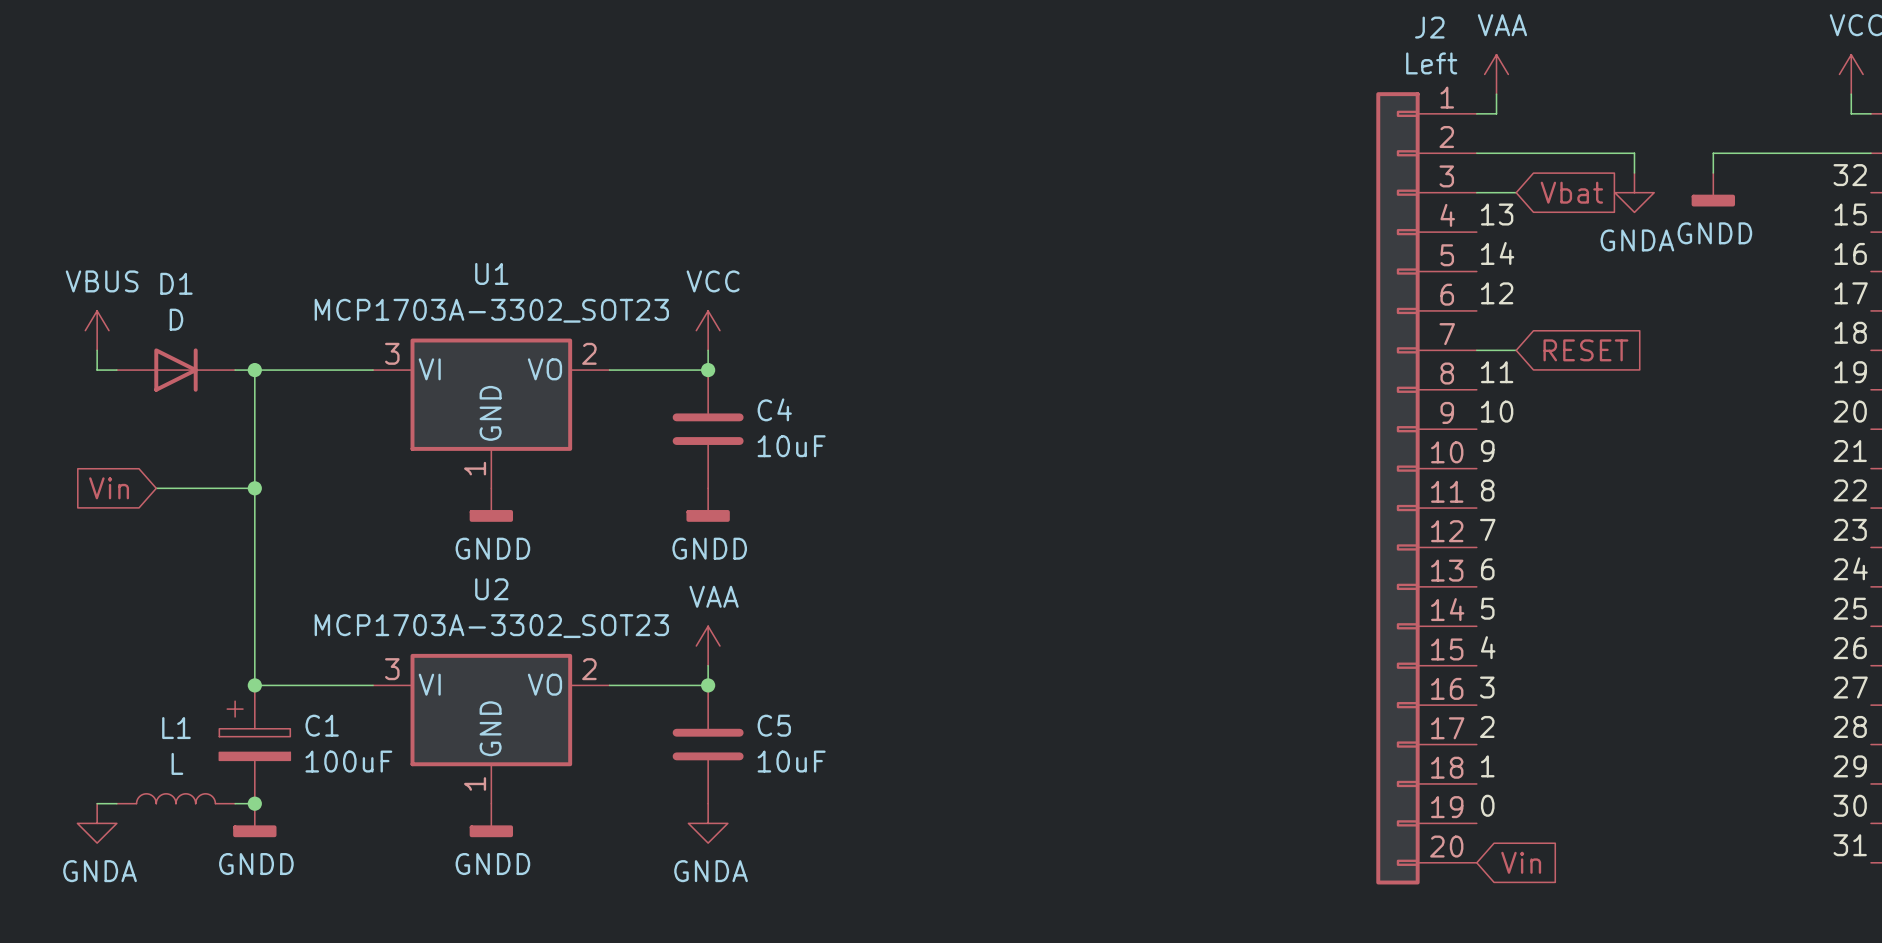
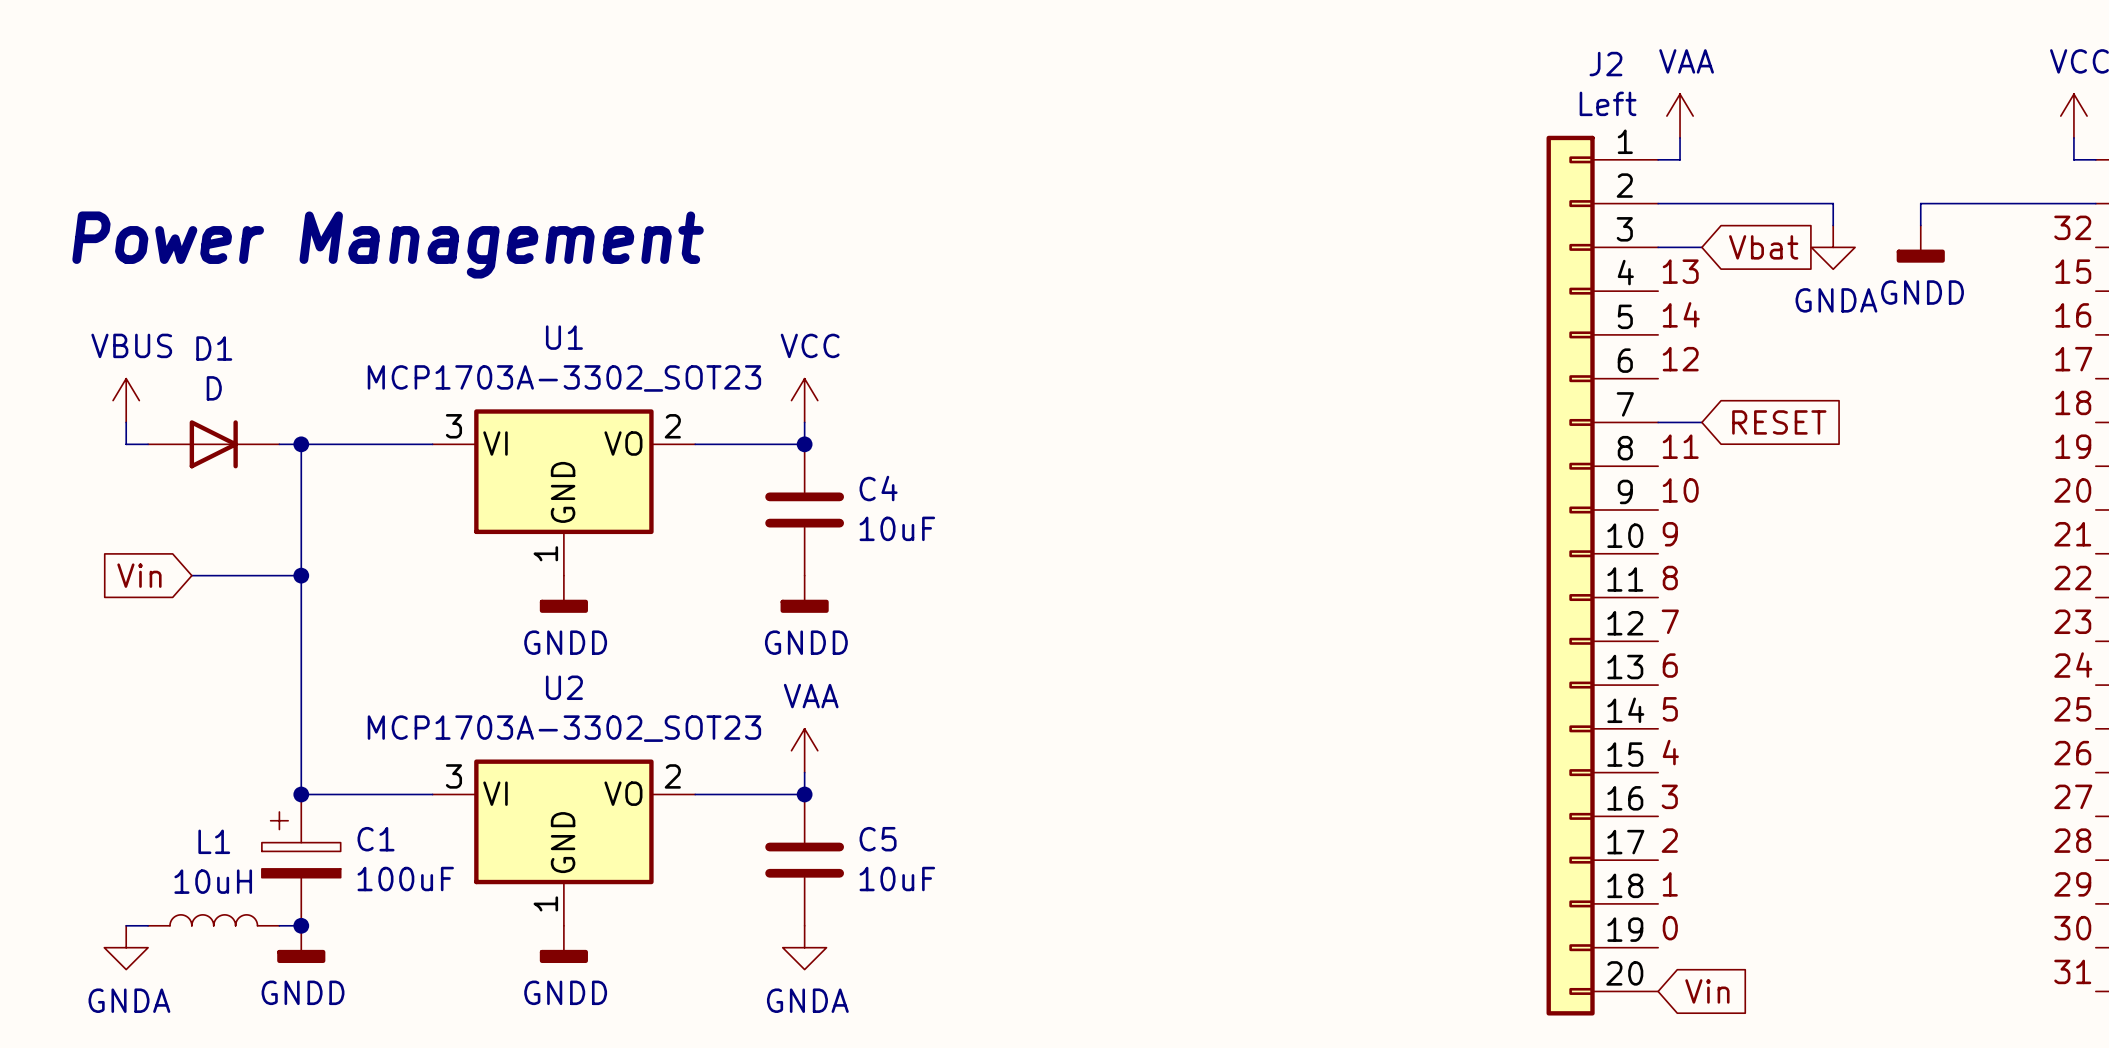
text: none -> Power Management (388, 245)
L1 value: L (177, 763) -> 10uH (213, 881)

